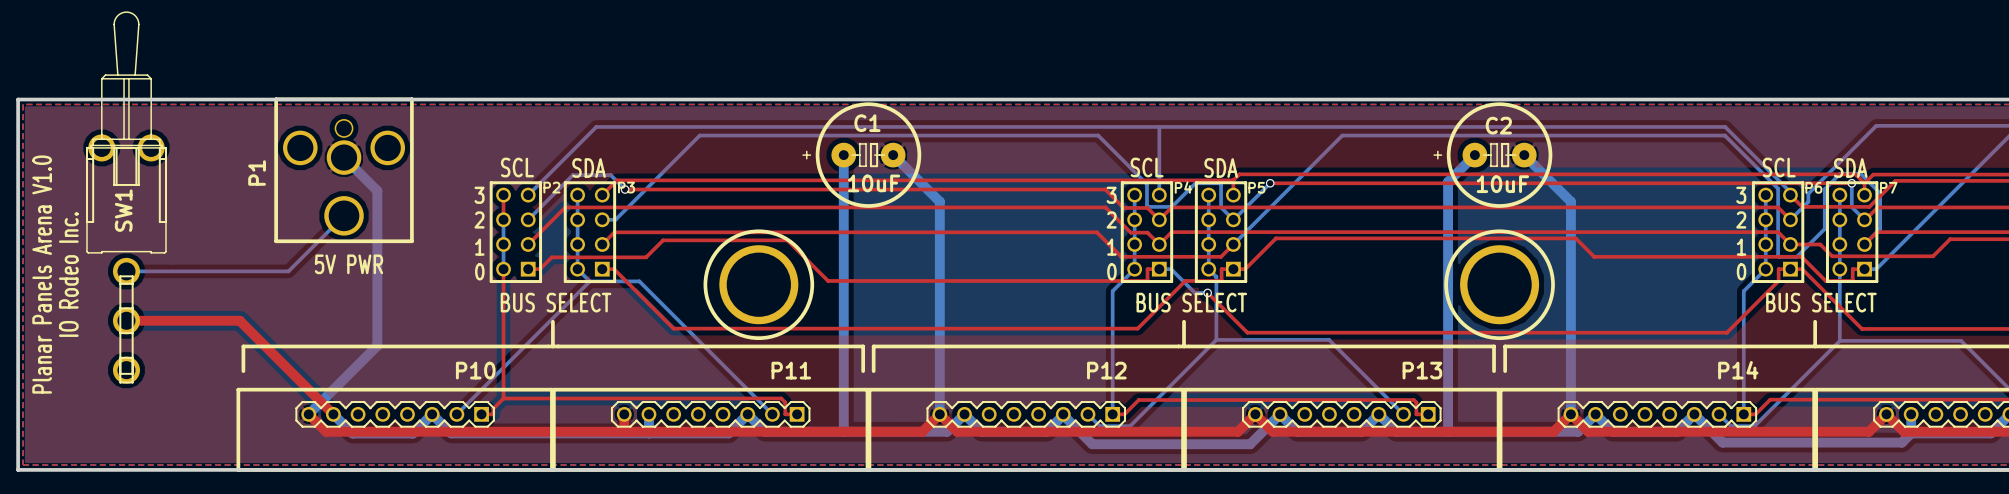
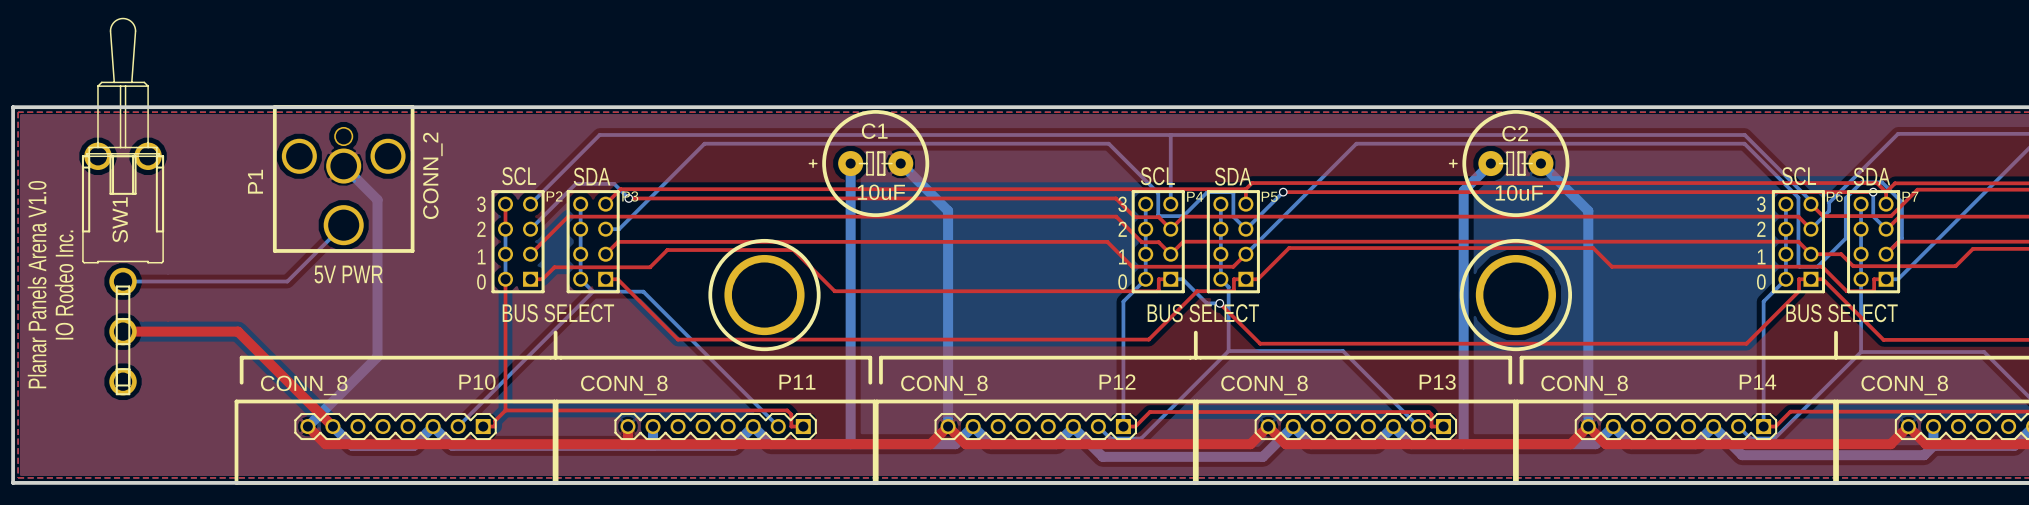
P1 value: none -> CONN_2 (432, 175)
P10 value: none -> CONN_8 (304, 385)
P11 value: none -> CONN_8 (624, 385)
P12 value: none -> CONN_8 (944, 385)
P13 value: none -> CONN_8 (1264, 385)
P14 value: none -> CONN_8 (1584, 385)
part value: none -> CONN_8 (1904, 385)

